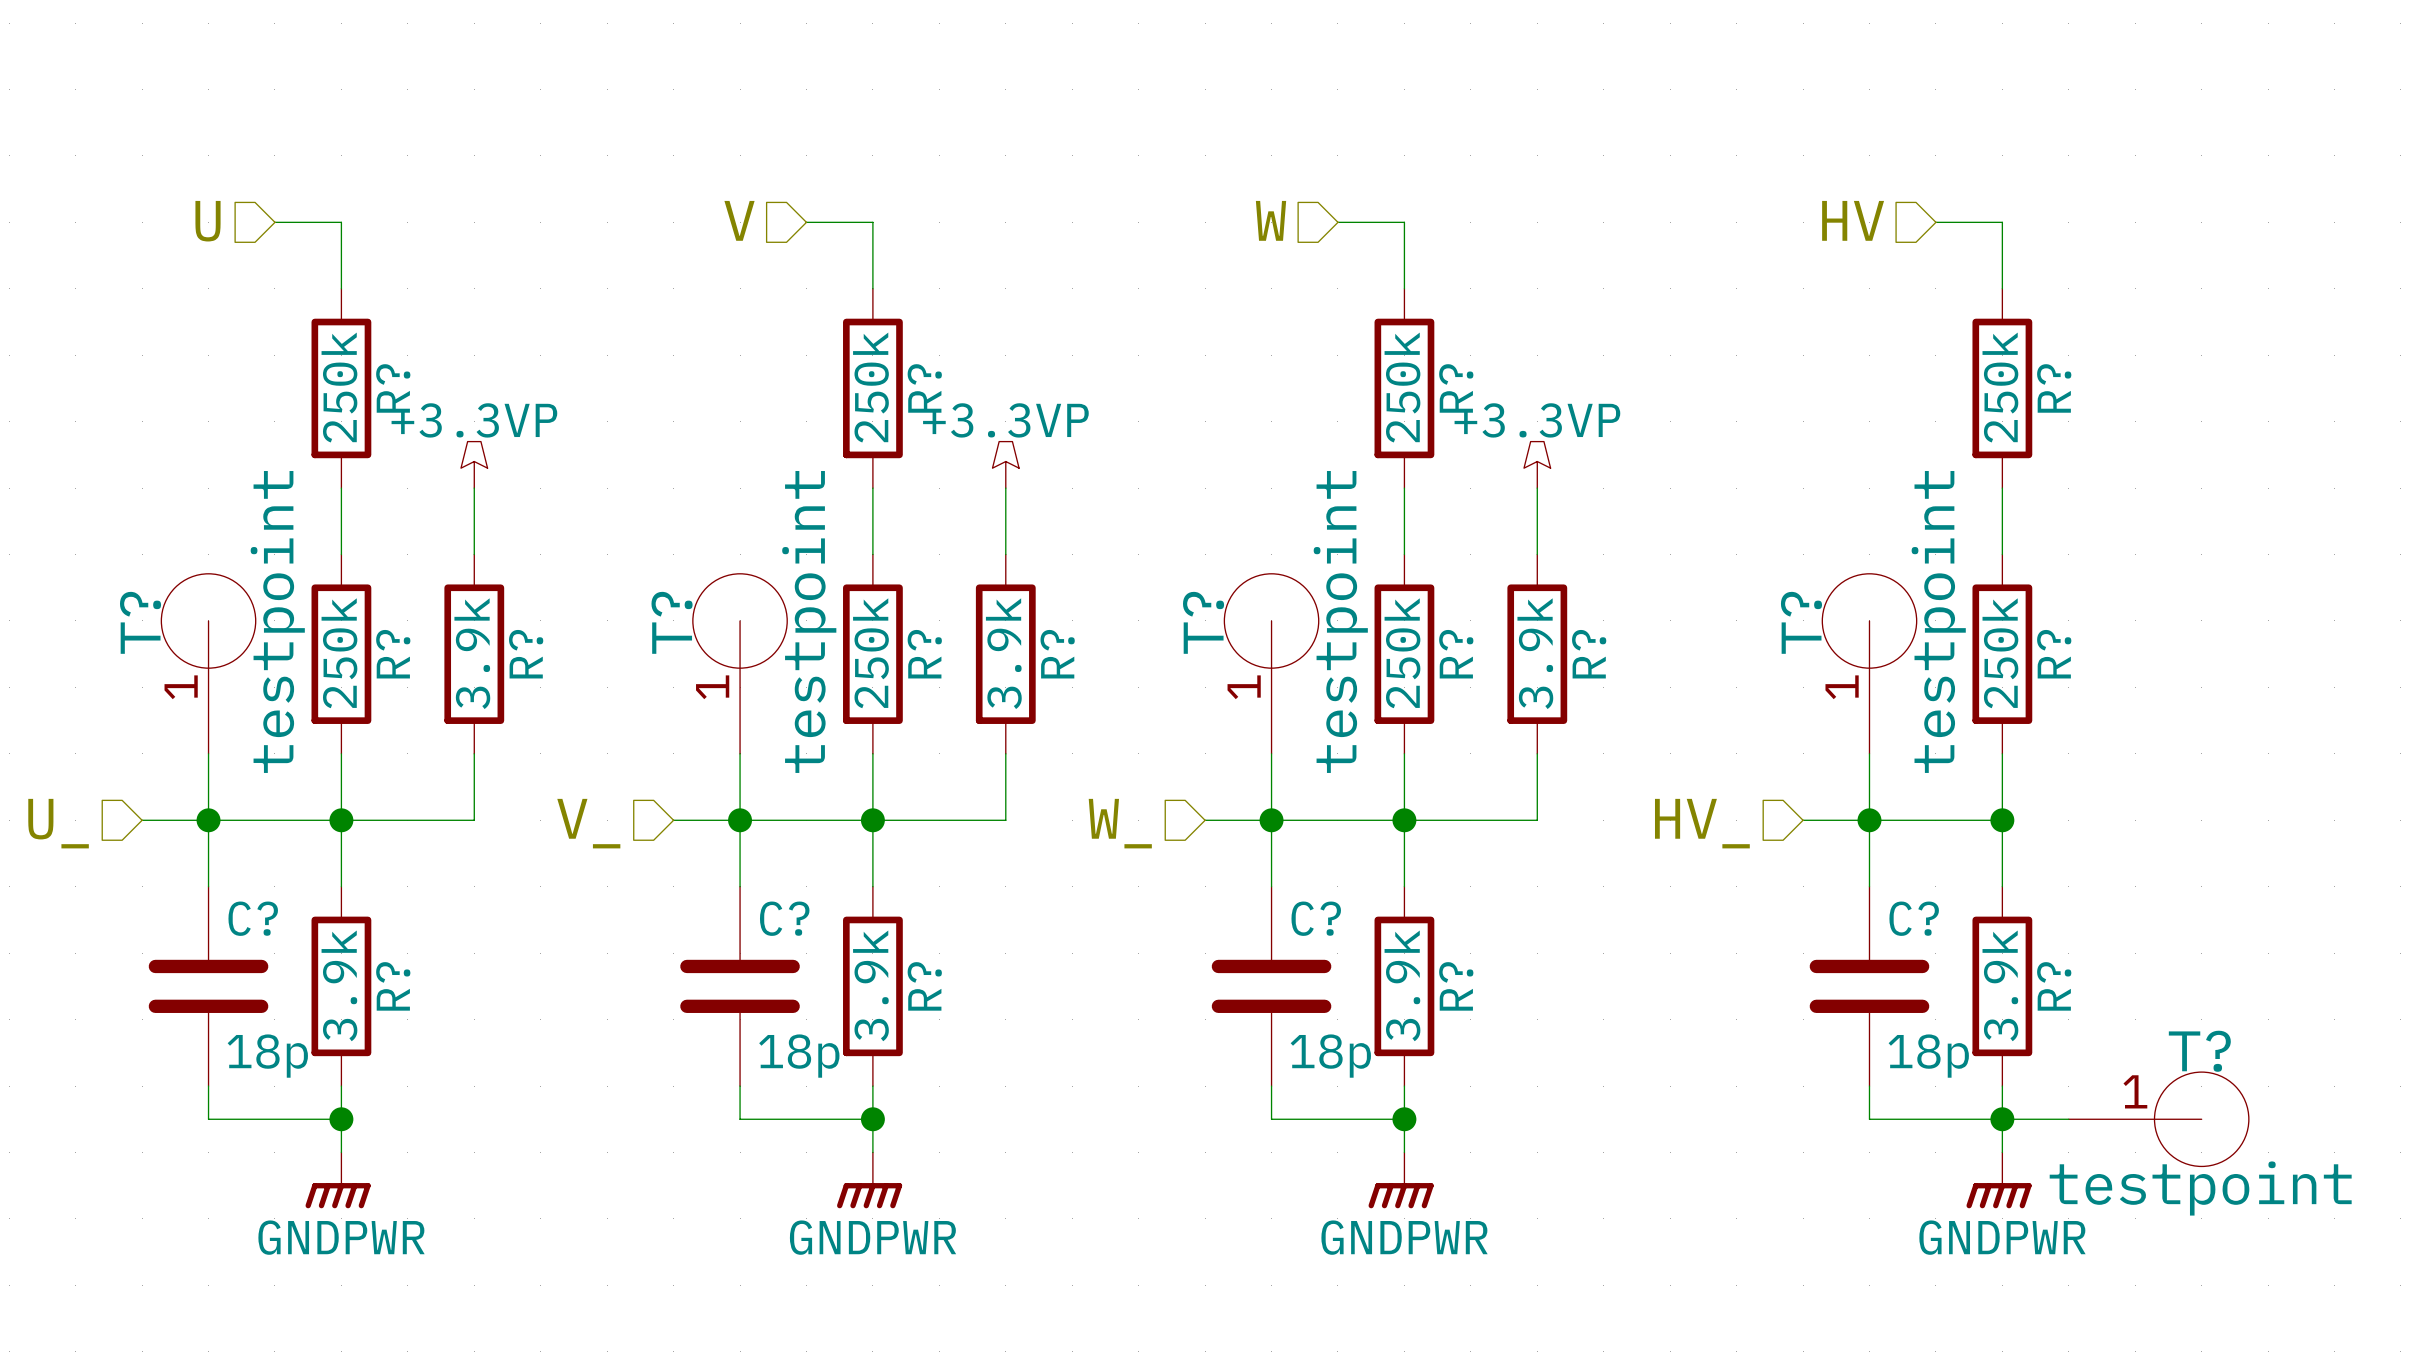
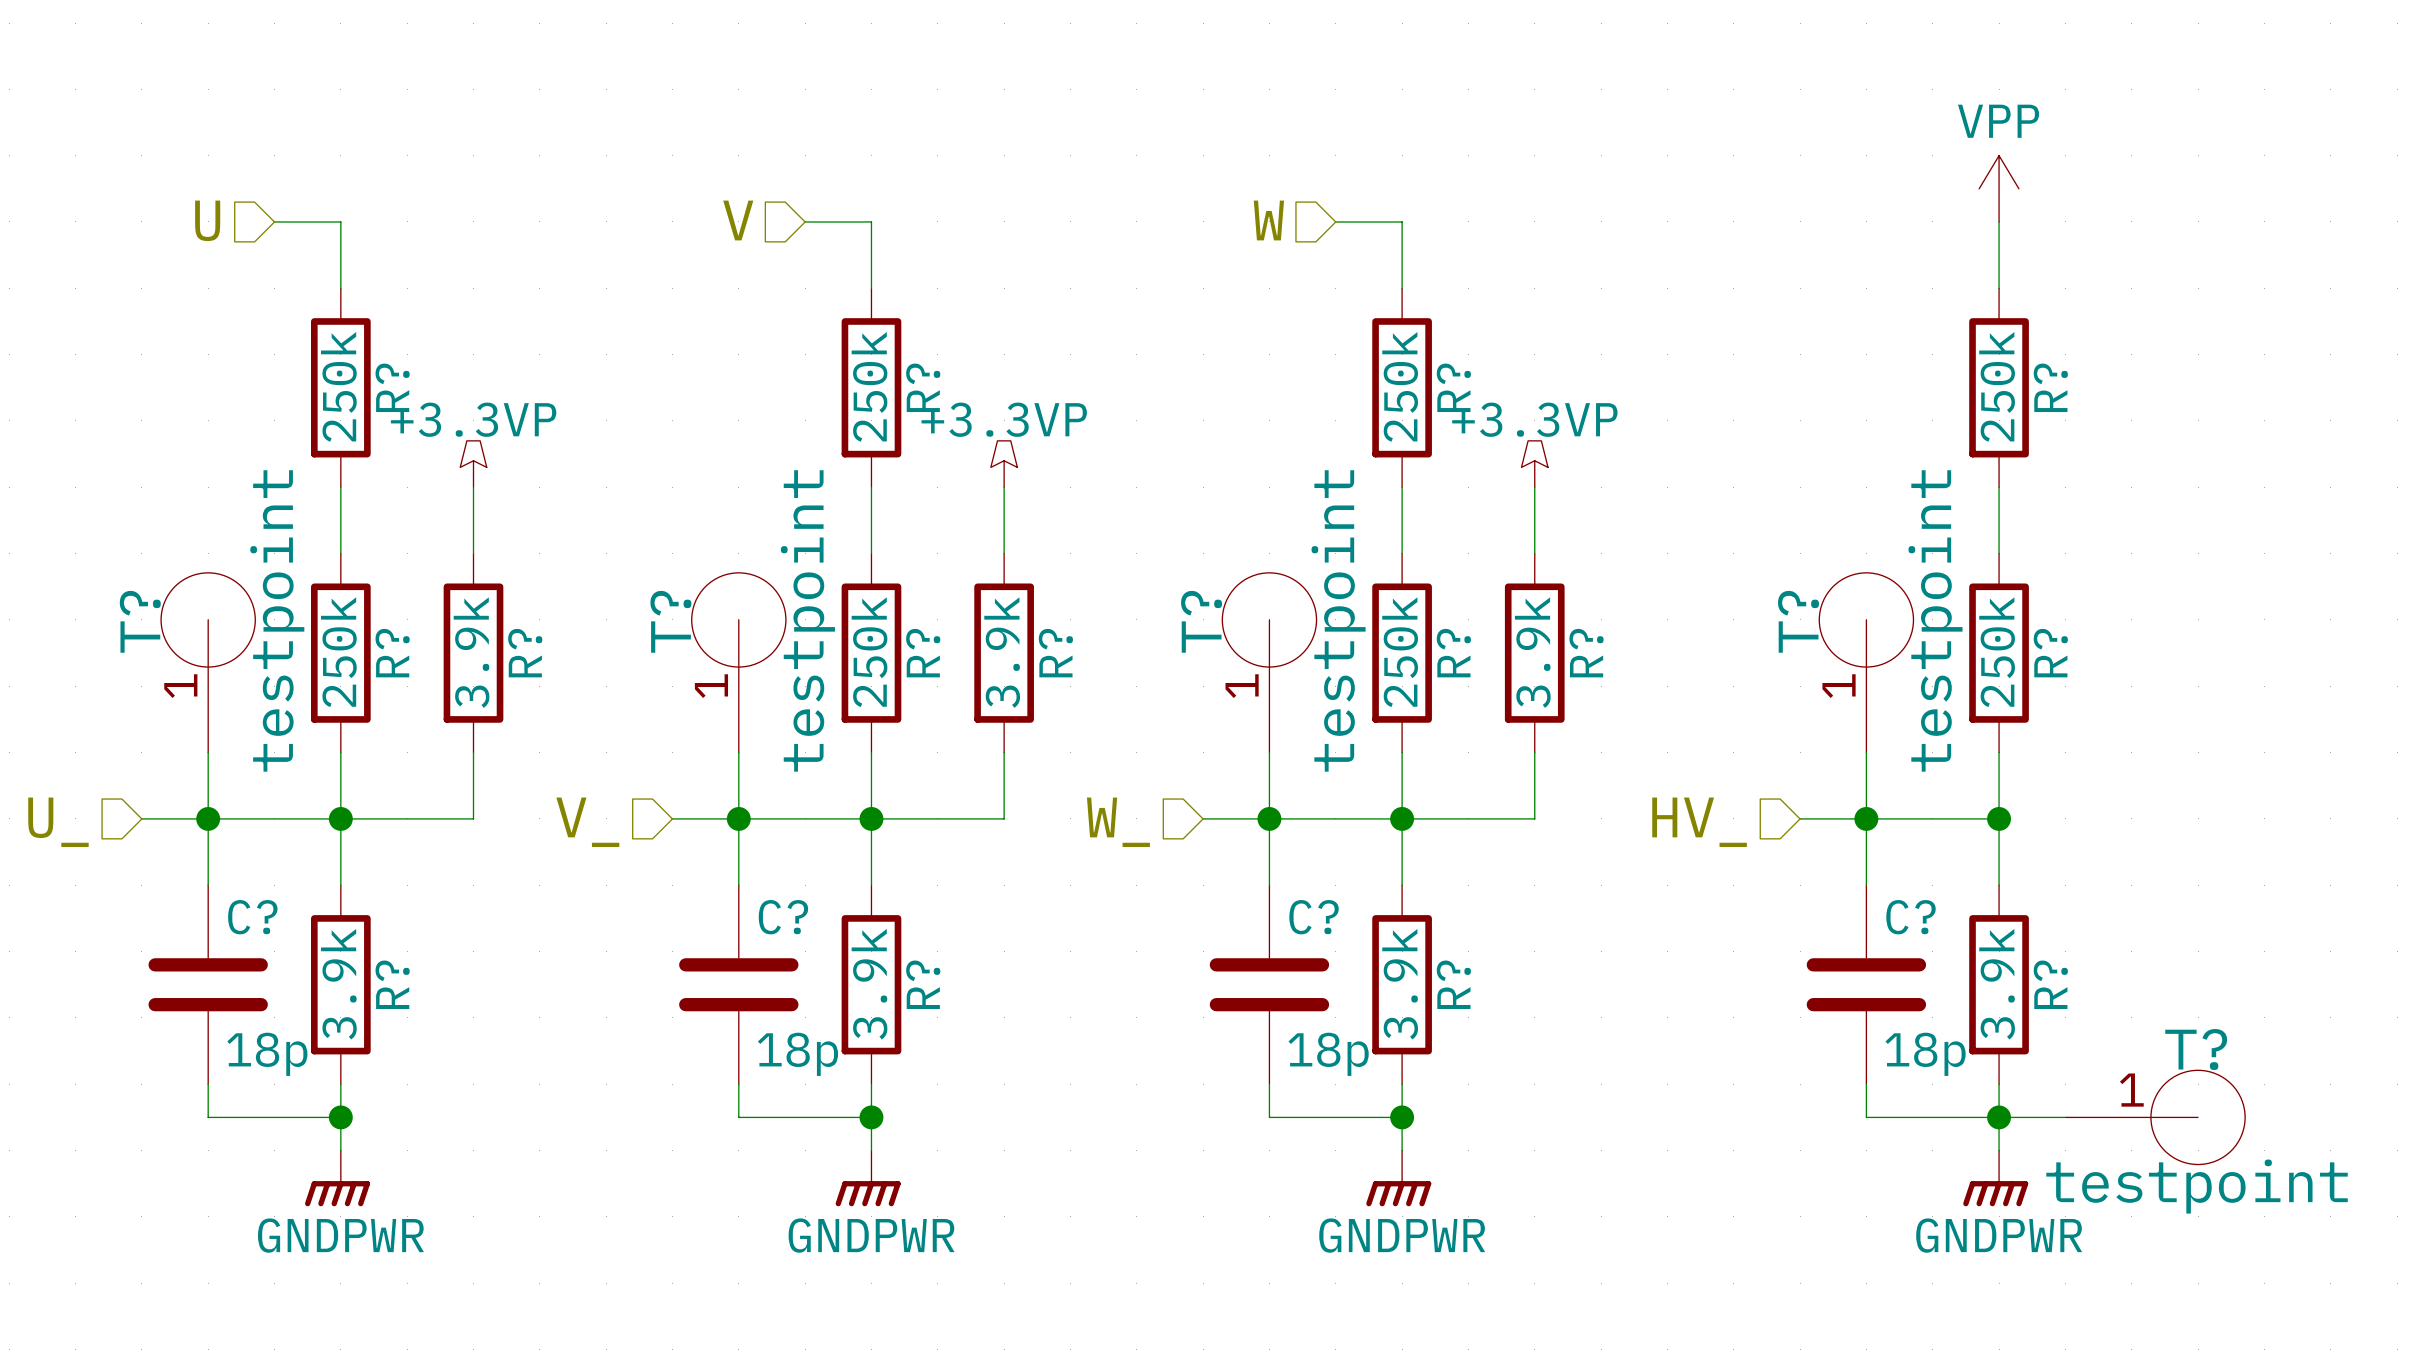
power symbol: none -> VPP (1999, 188)
hierarchical label: HV (1853, 220) -> none
wire: (1935, 222) (2002, 222) -> none

